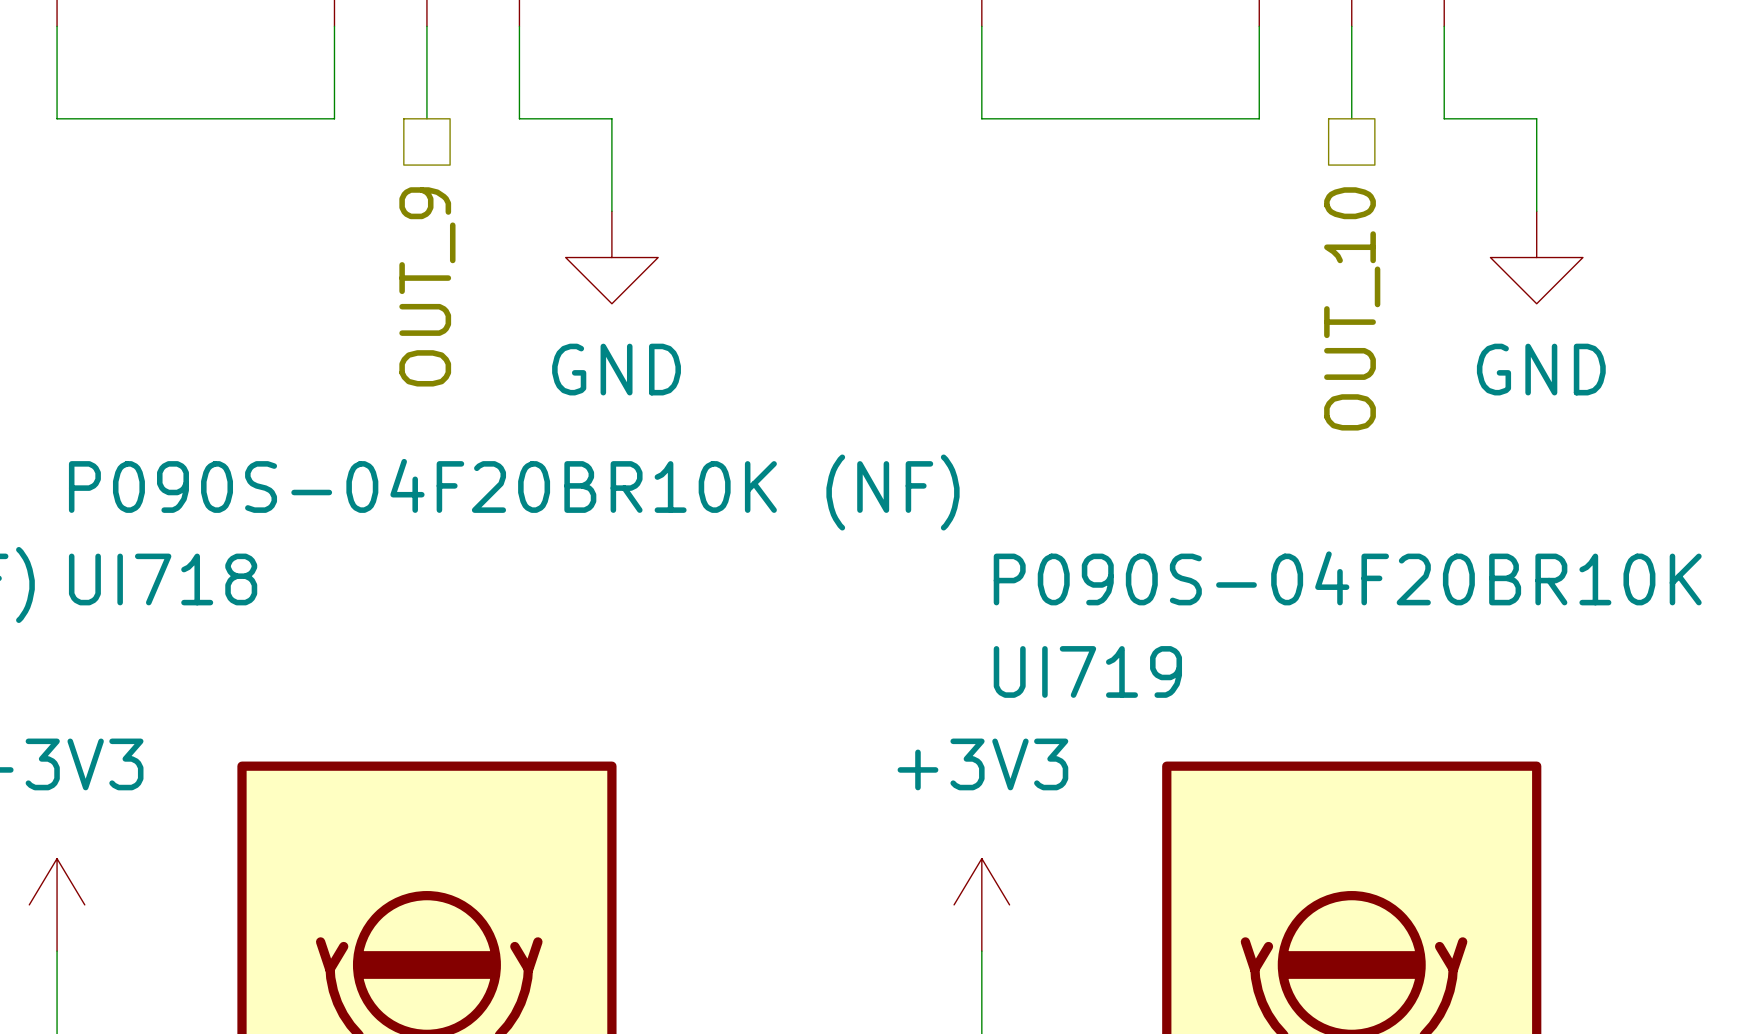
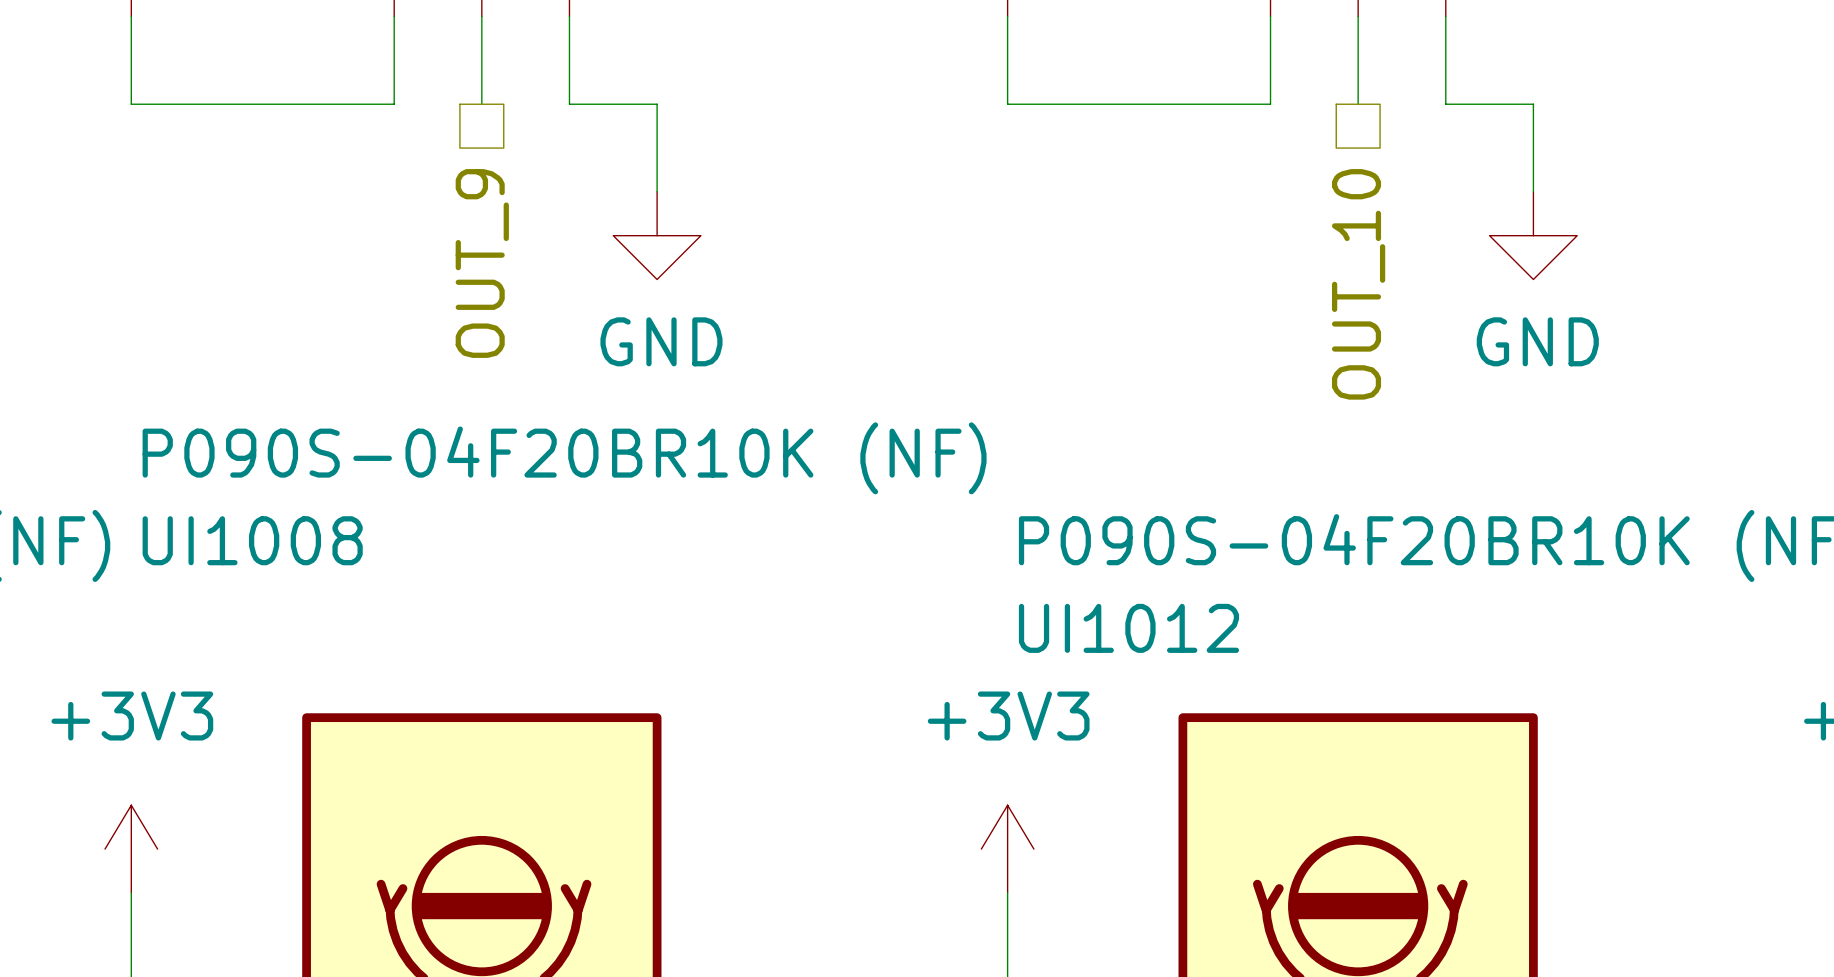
UI718 name: UI718 (163, 579) -> UI1008 (252, 540)
UI719 name: UI719 (1087, 671) -> UI1012 (1128, 628)

